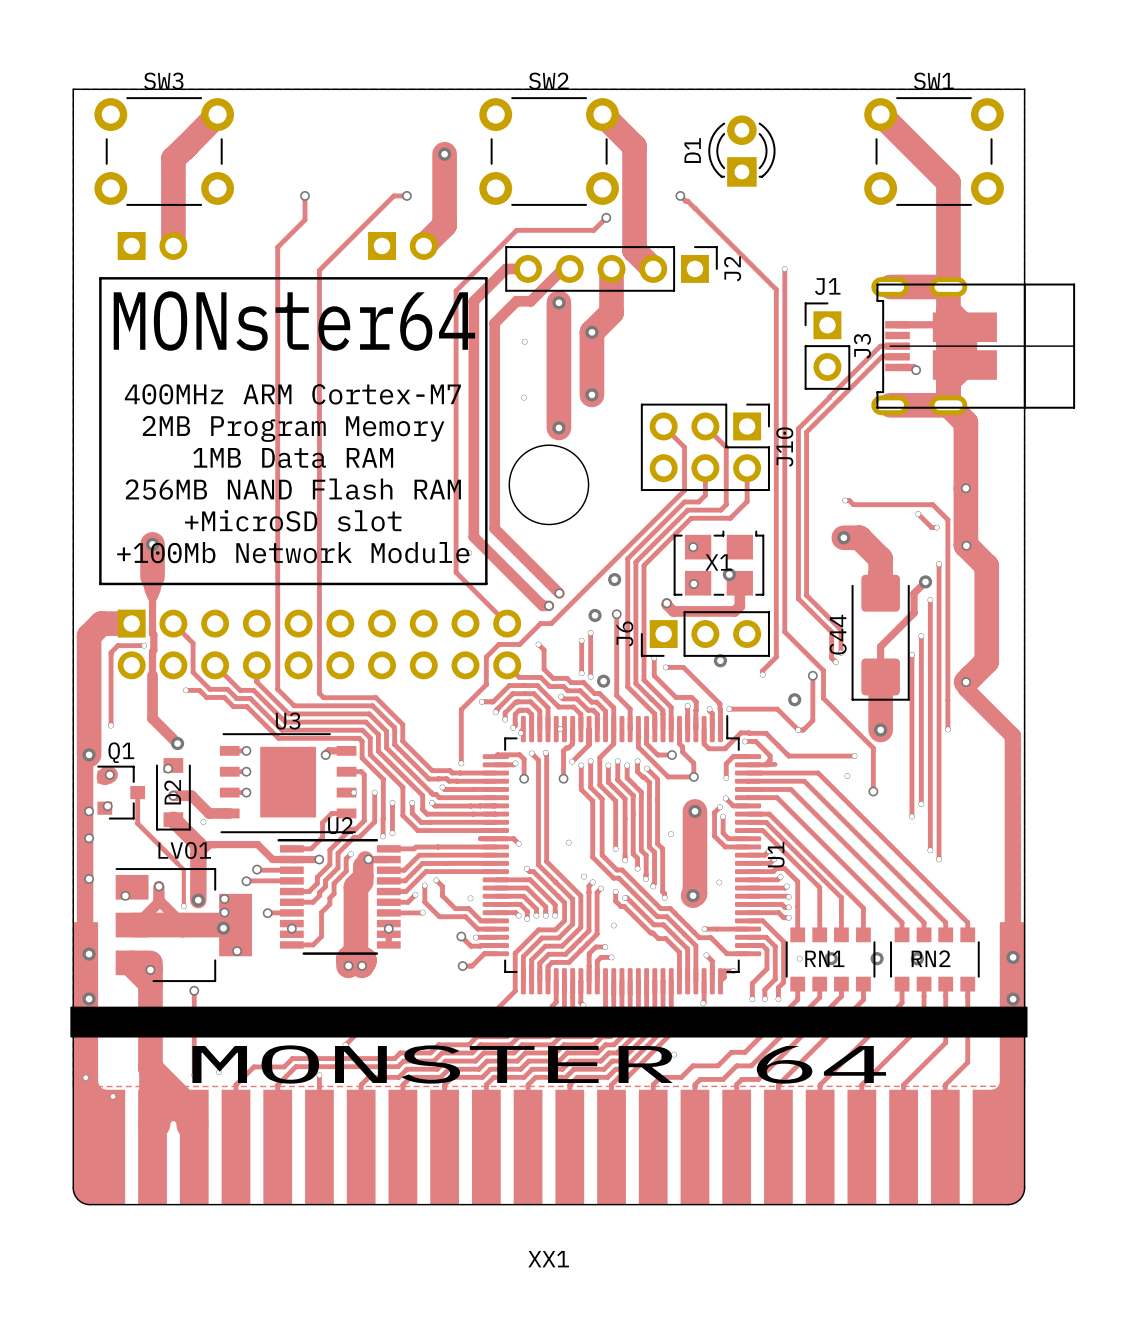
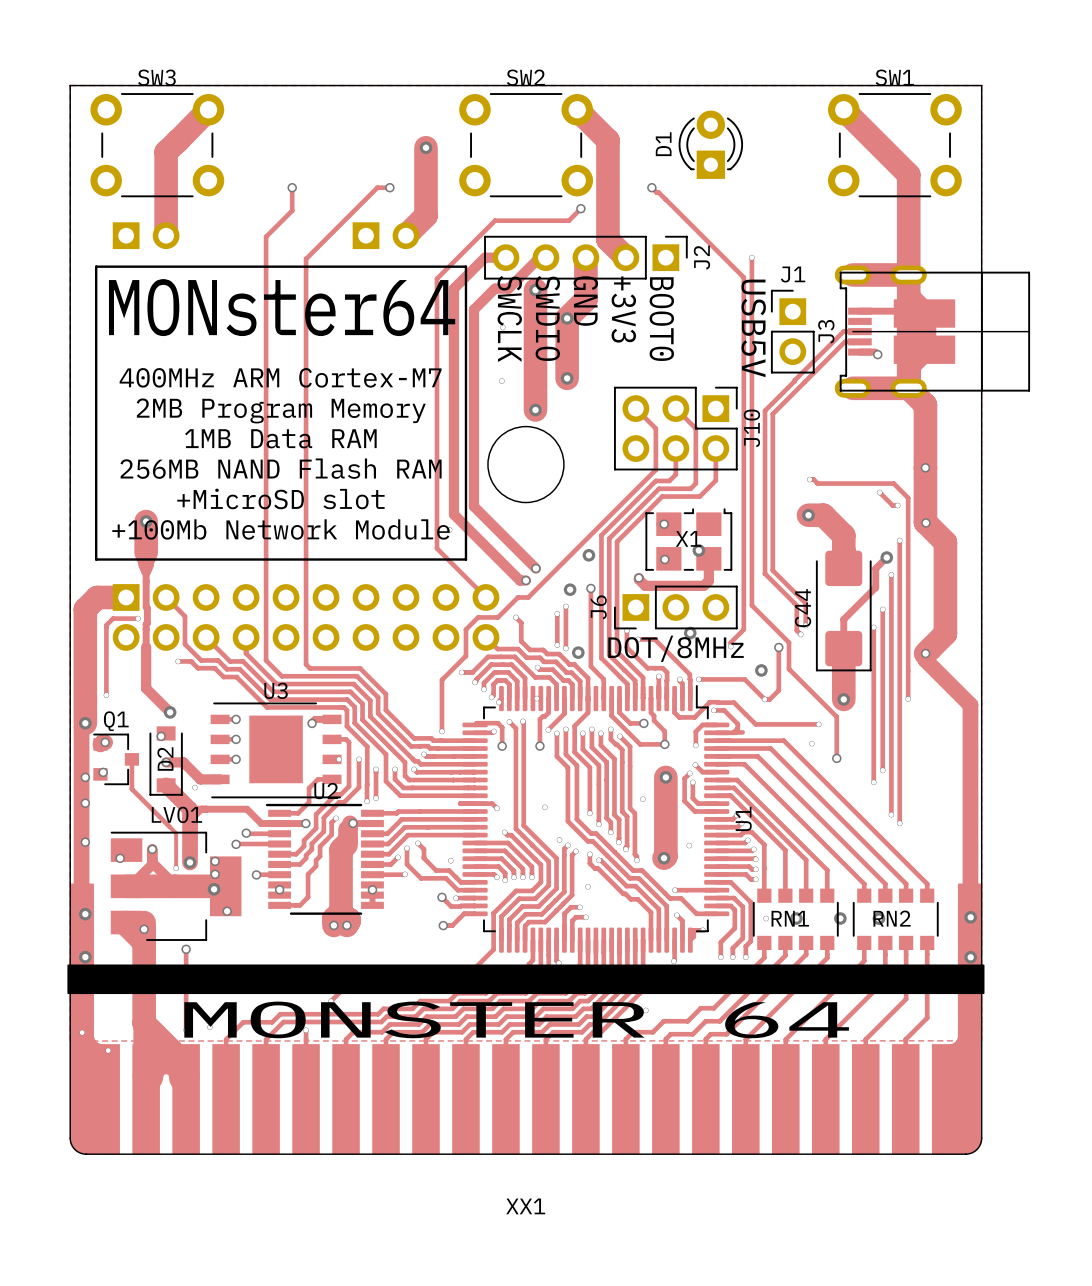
text: none -> GND (585, 301)
text: none -> +3V3 (623, 309)
text: none -> SWCLK (509, 318)
text: none -> SWDIO (547, 318)
text: none -> BOOT0 (661, 319)
text: none -> USB5V (753, 328)
text: none -> DOT/8MHz (676, 648)

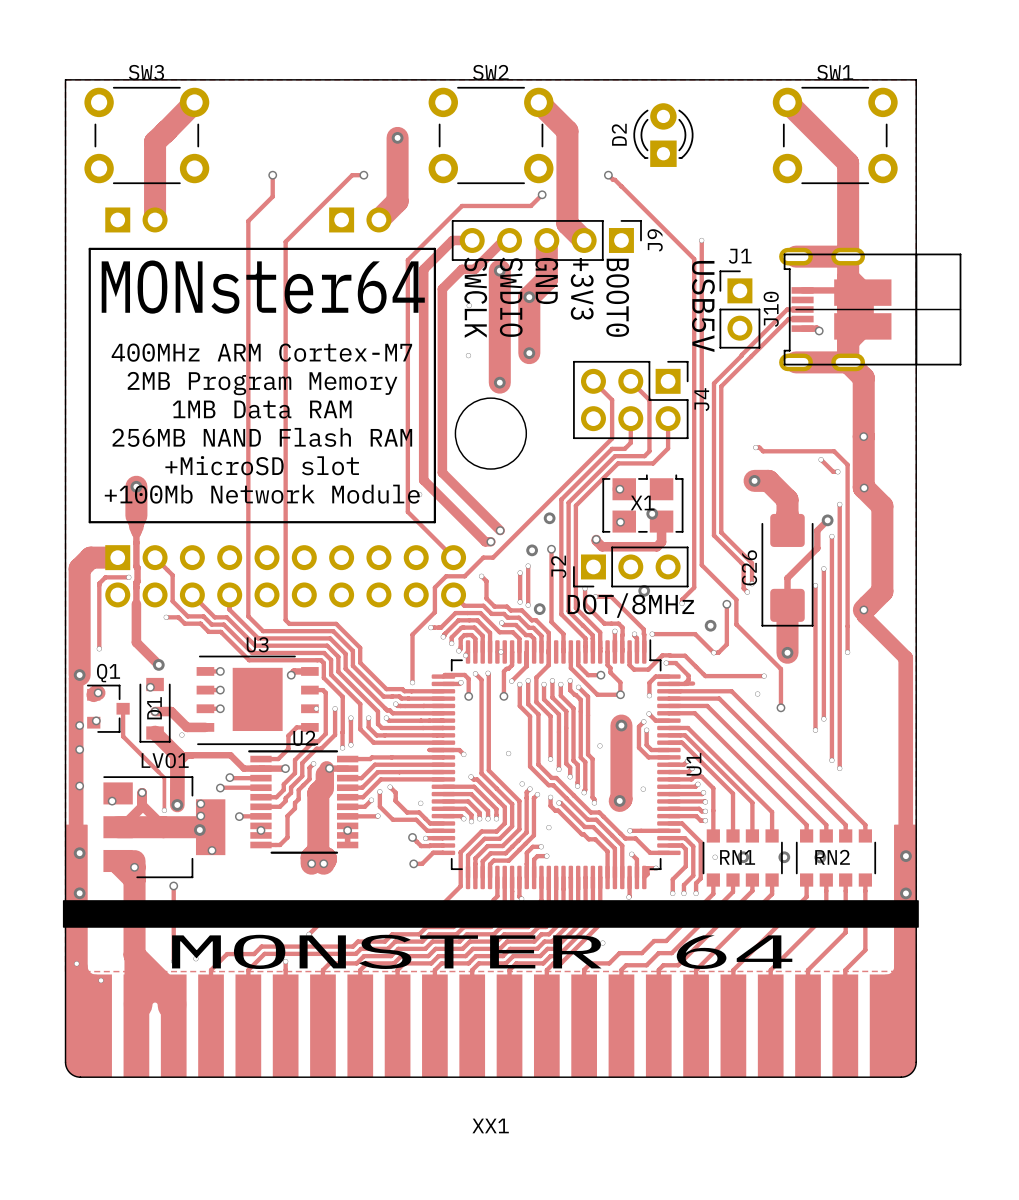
D1 name: D1 (663, 144) -> D2 (619, 134)
J2 name: J2 (701, 257) -> J9 (655, 240)
J3 name: J3 (826, 331) -> J10 (771, 309)
J10 name: J10 (751, 428) -> J4 (701, 399)
J6 name: J6 (598, 607) -> J2 (558, 566)
C44 name: C44 (803, 608) -> C26 (749, 567)
D2 name: D2 (165, 759) -> D1 (154, 708)

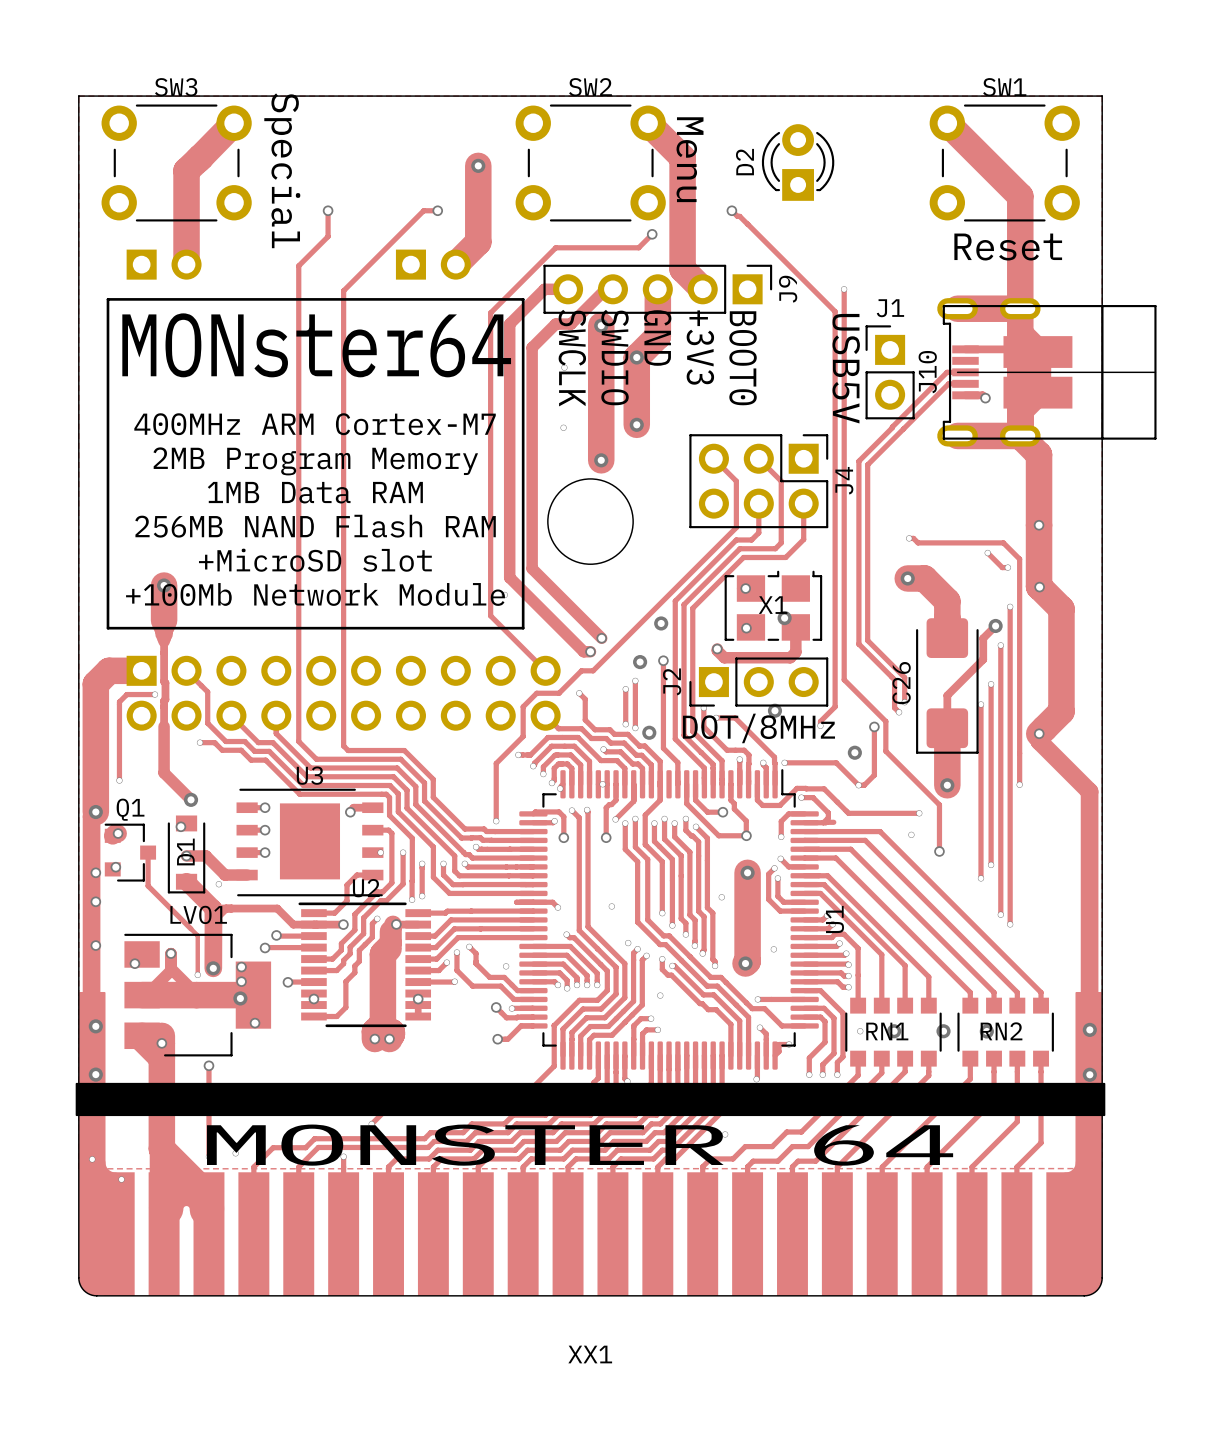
text: none -> Menu (690, 159)
text: none -> Special (282, 170)
text: none -> Reset (1008, 247)

